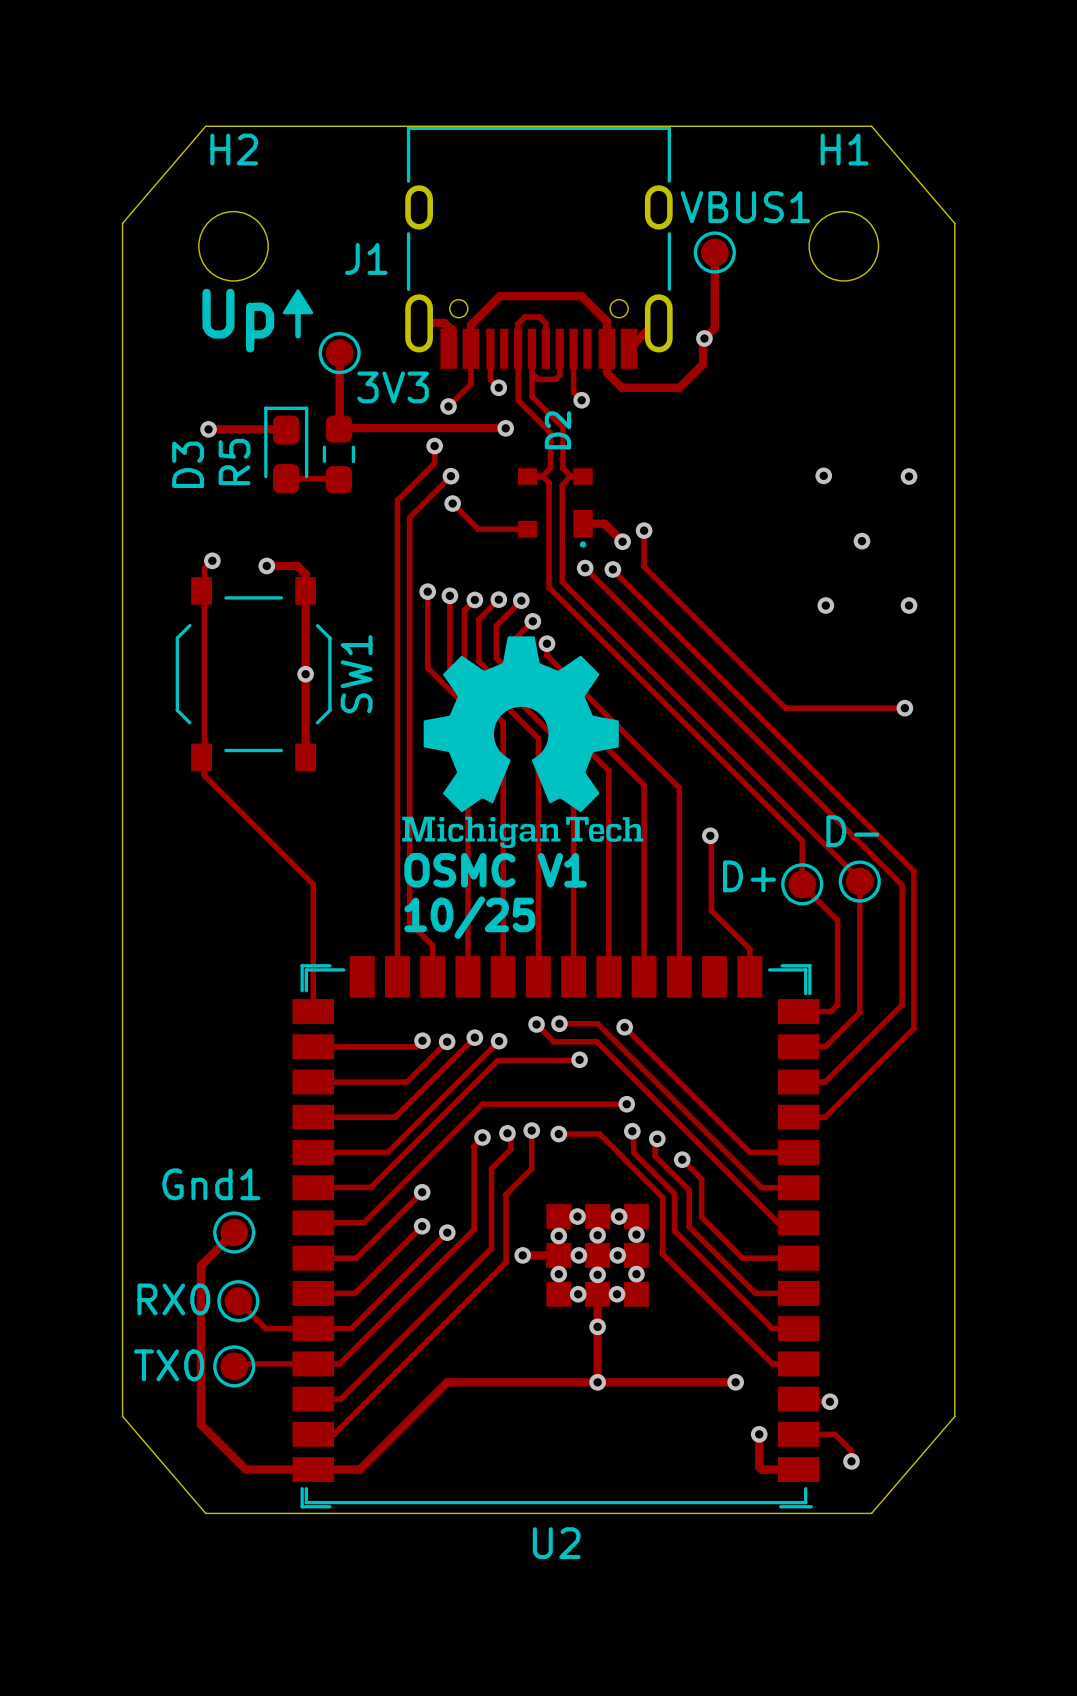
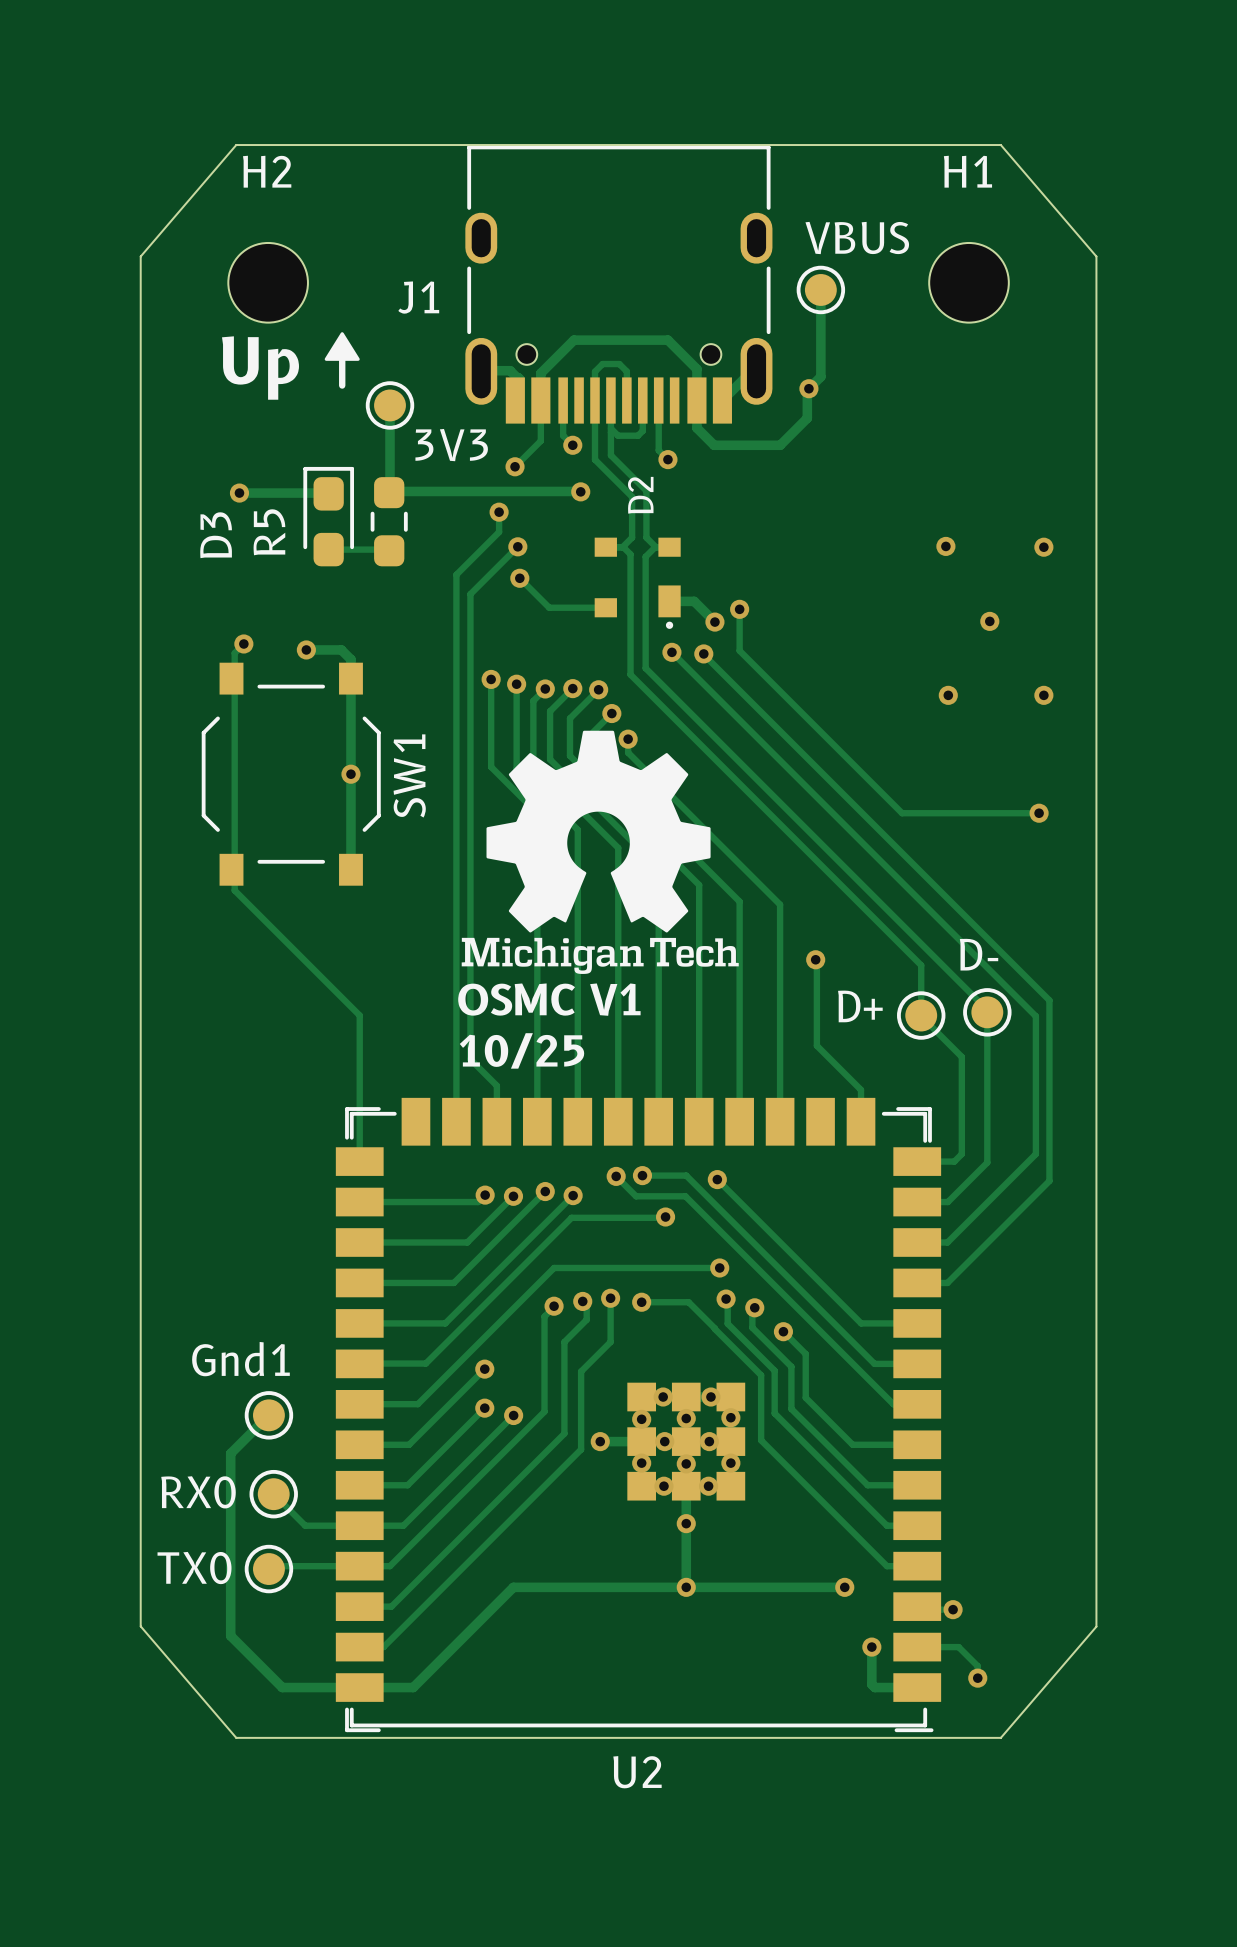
VBUS1 name: VBUS1 (745, 207) -> VBUS (857, 238)

